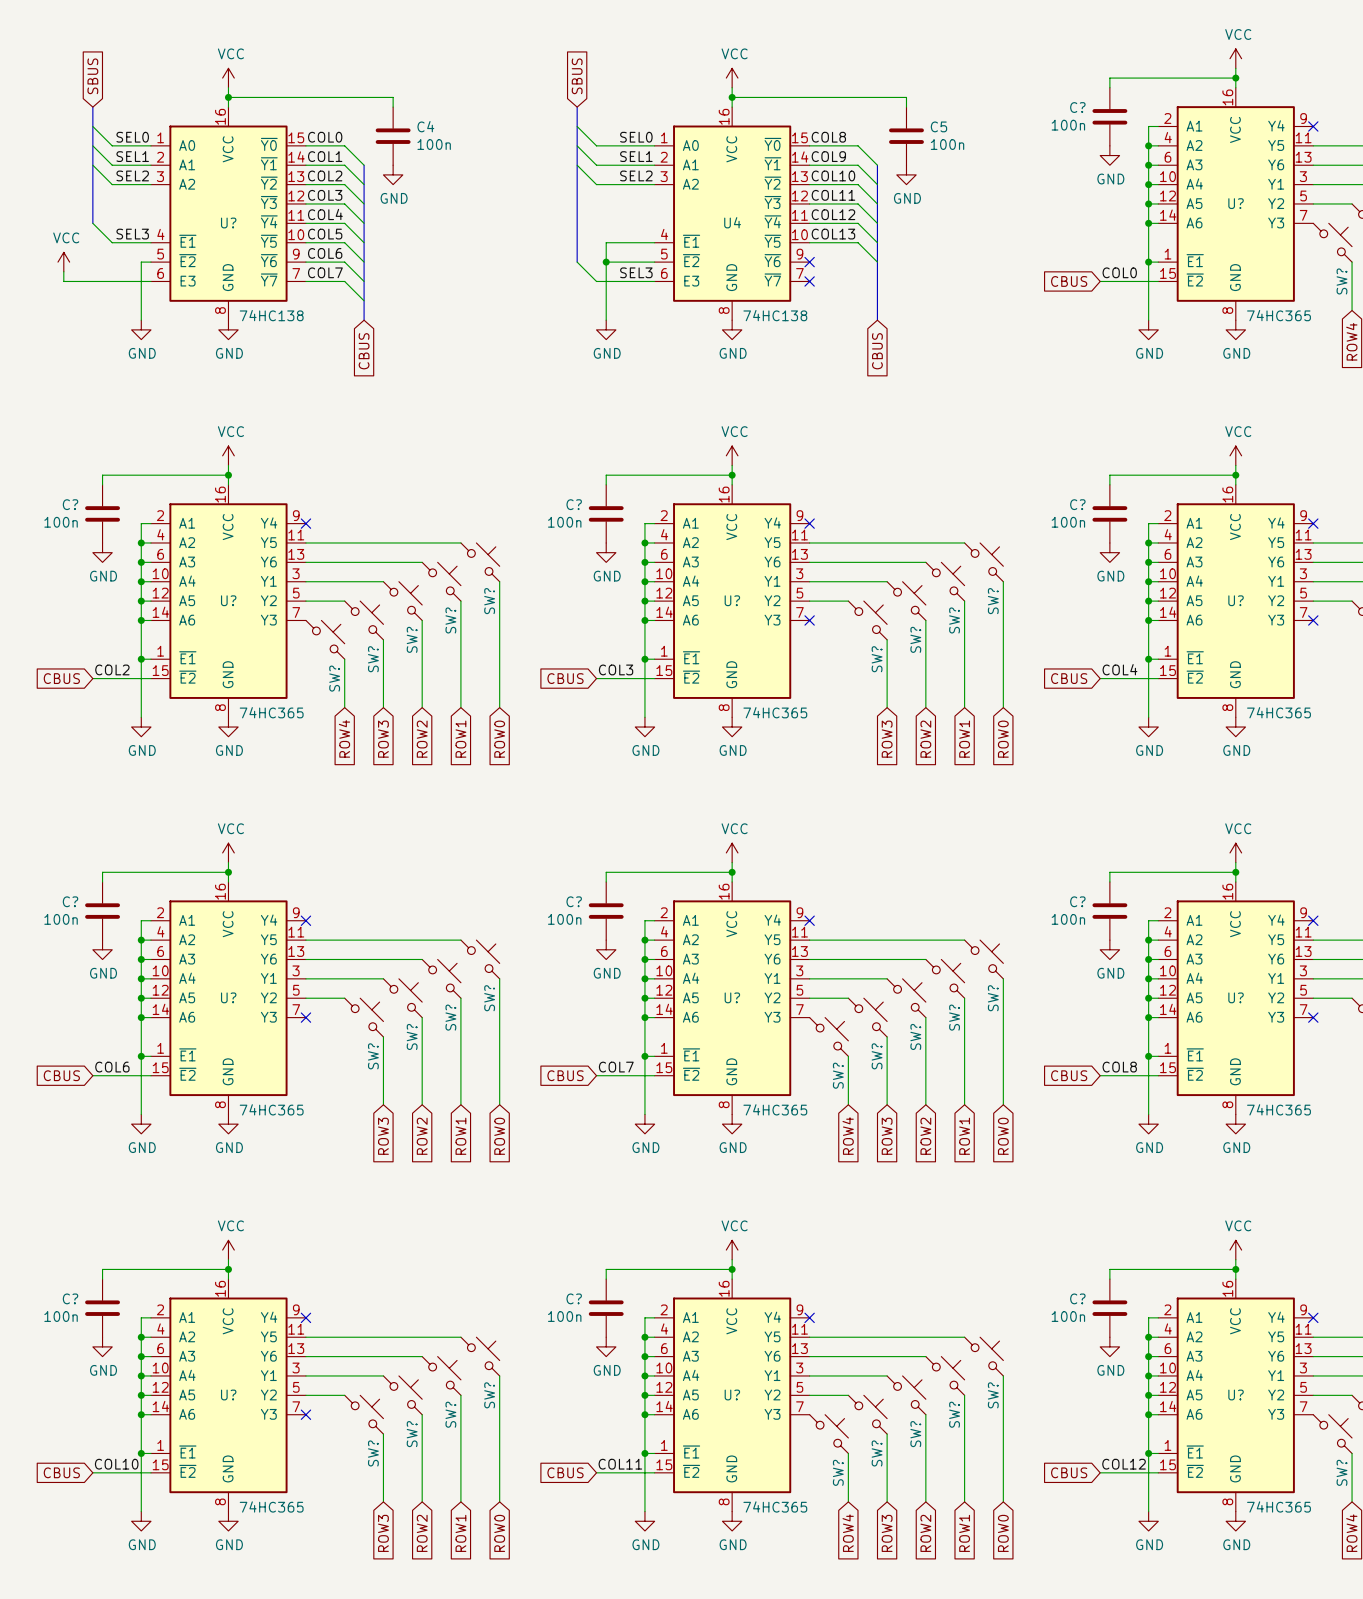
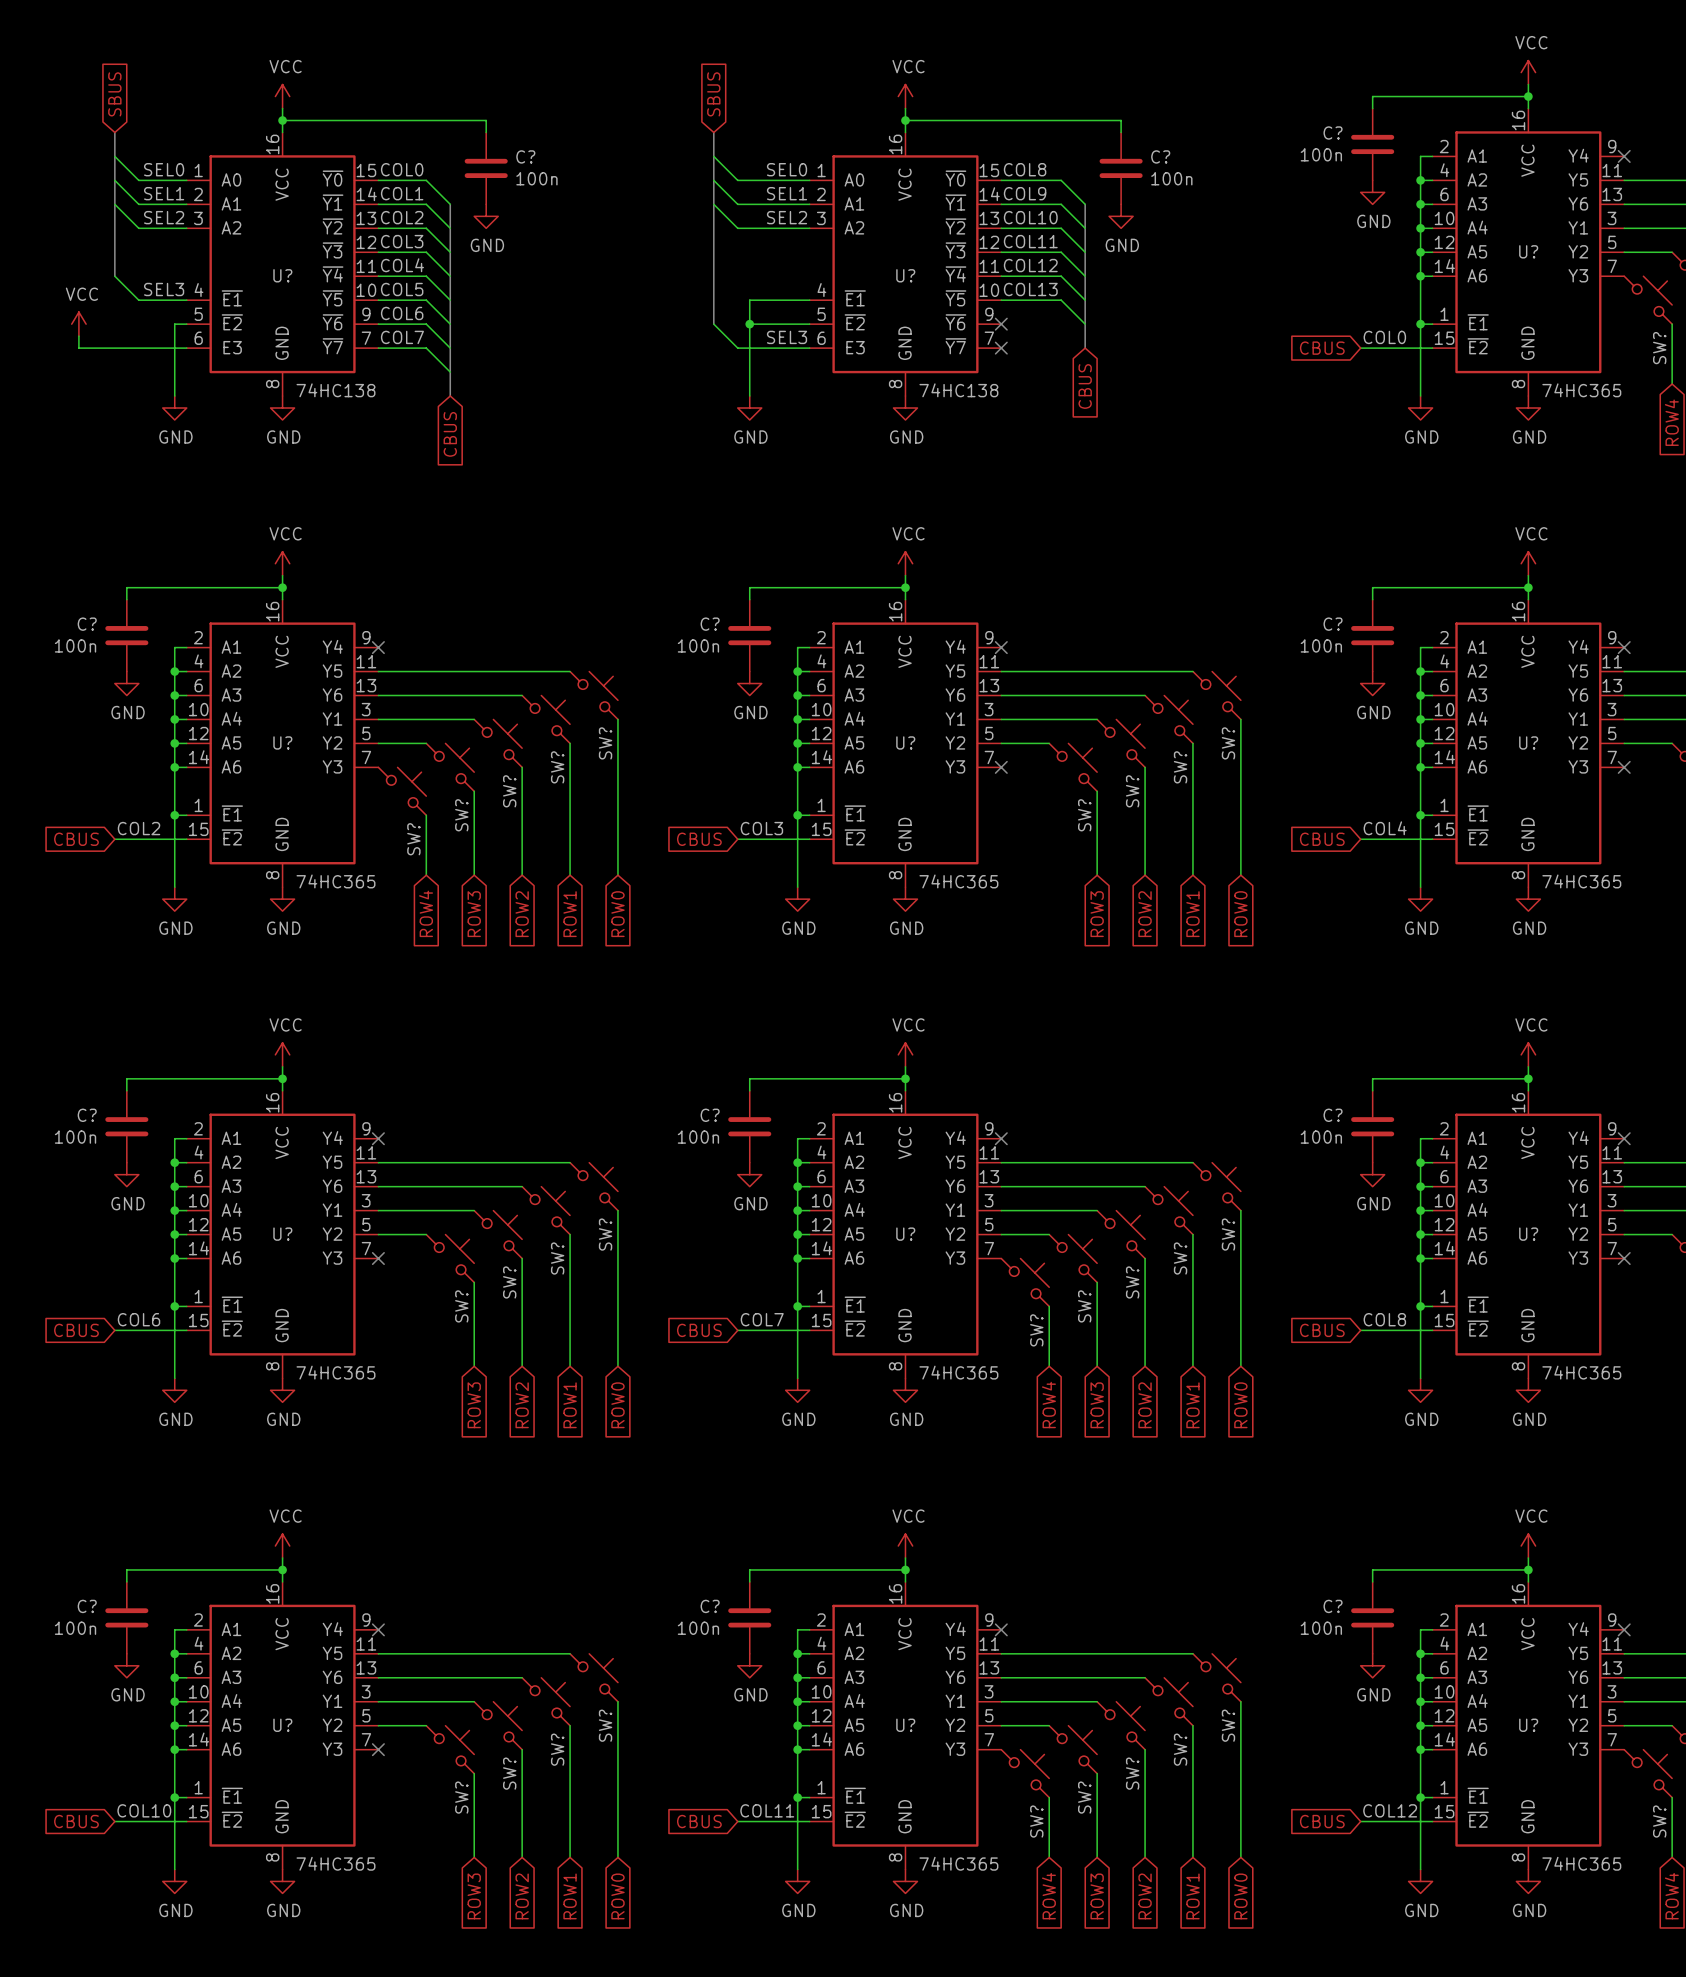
C4 name: C4 (425, 126) -> C? (525, 156)
C5 name: C5 (938, 126) -> C? (1160, 156)
U4 name: U4 (732, 222) -> U? (905, 275)
bus: (877, 281) (877, 320) -> none
global label position: CBUS (877, 351) -> CBUS (1085, 386)

